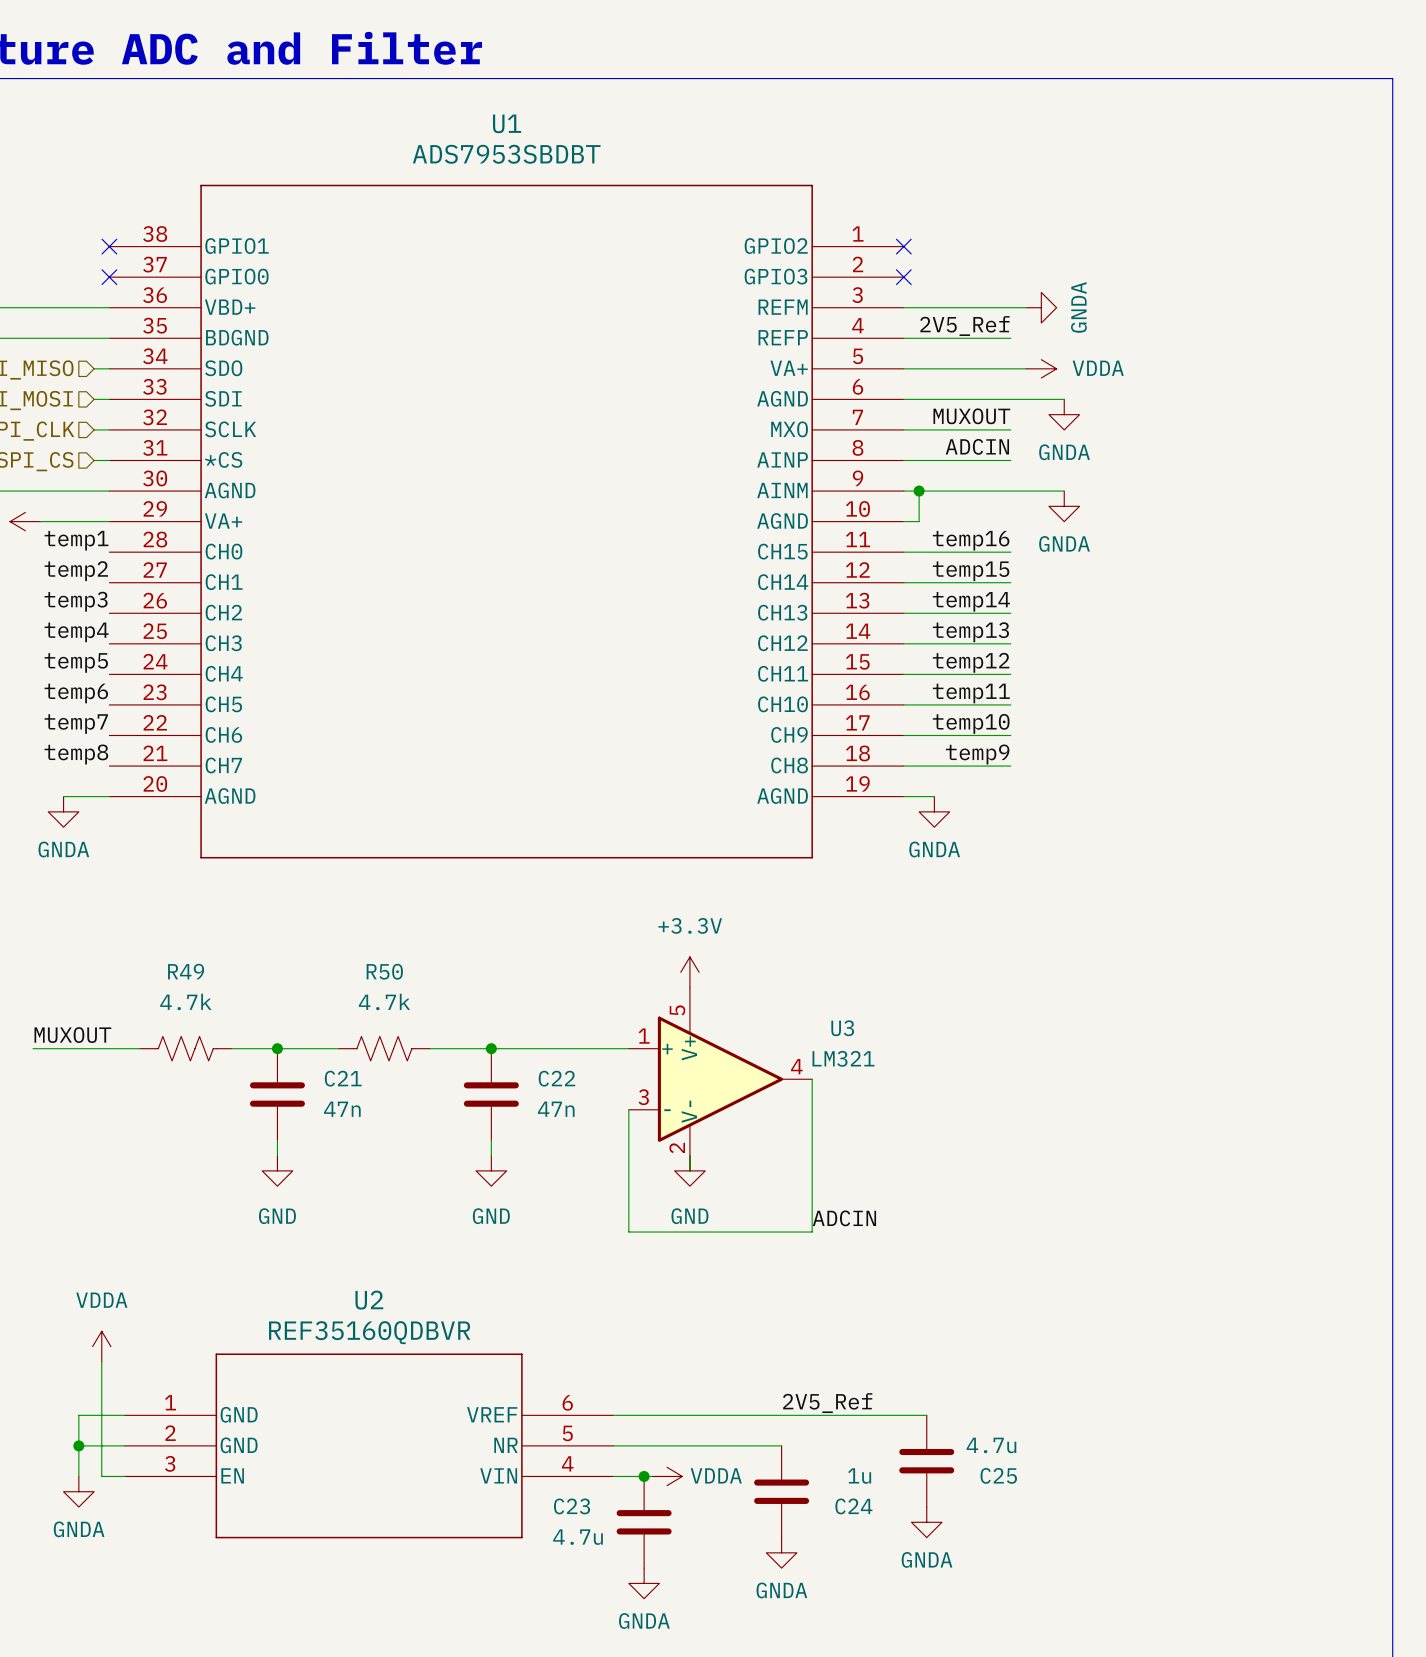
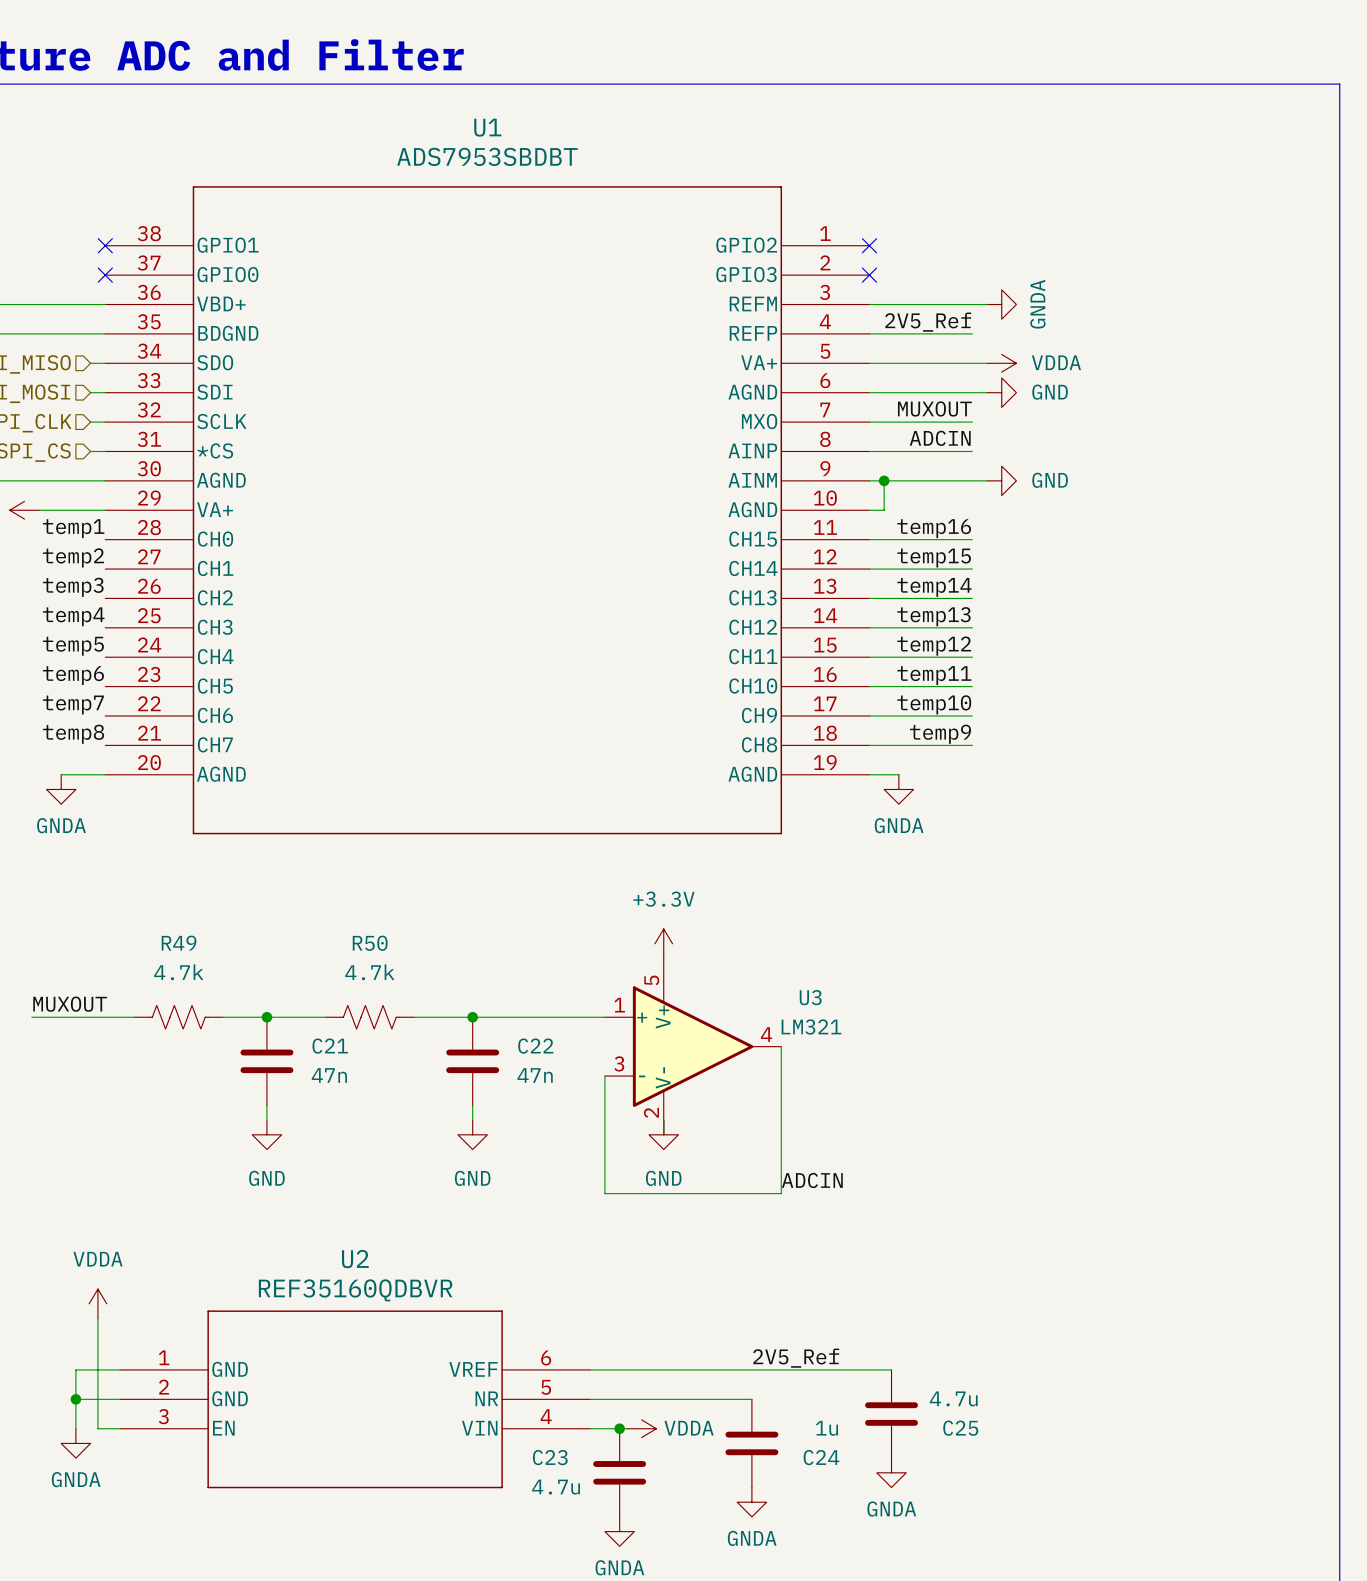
wire: (1026, 399) (1064, 399) -> none
power symbol: none -> GND (1001, 392)
power symbol: GNDA (1064, 414) -> none
wire: (1026, 491) (1064, 491) -> none
power symbol: none -> GND (1001, 480)
power symbol: GNDA (1064, 506) -> none

